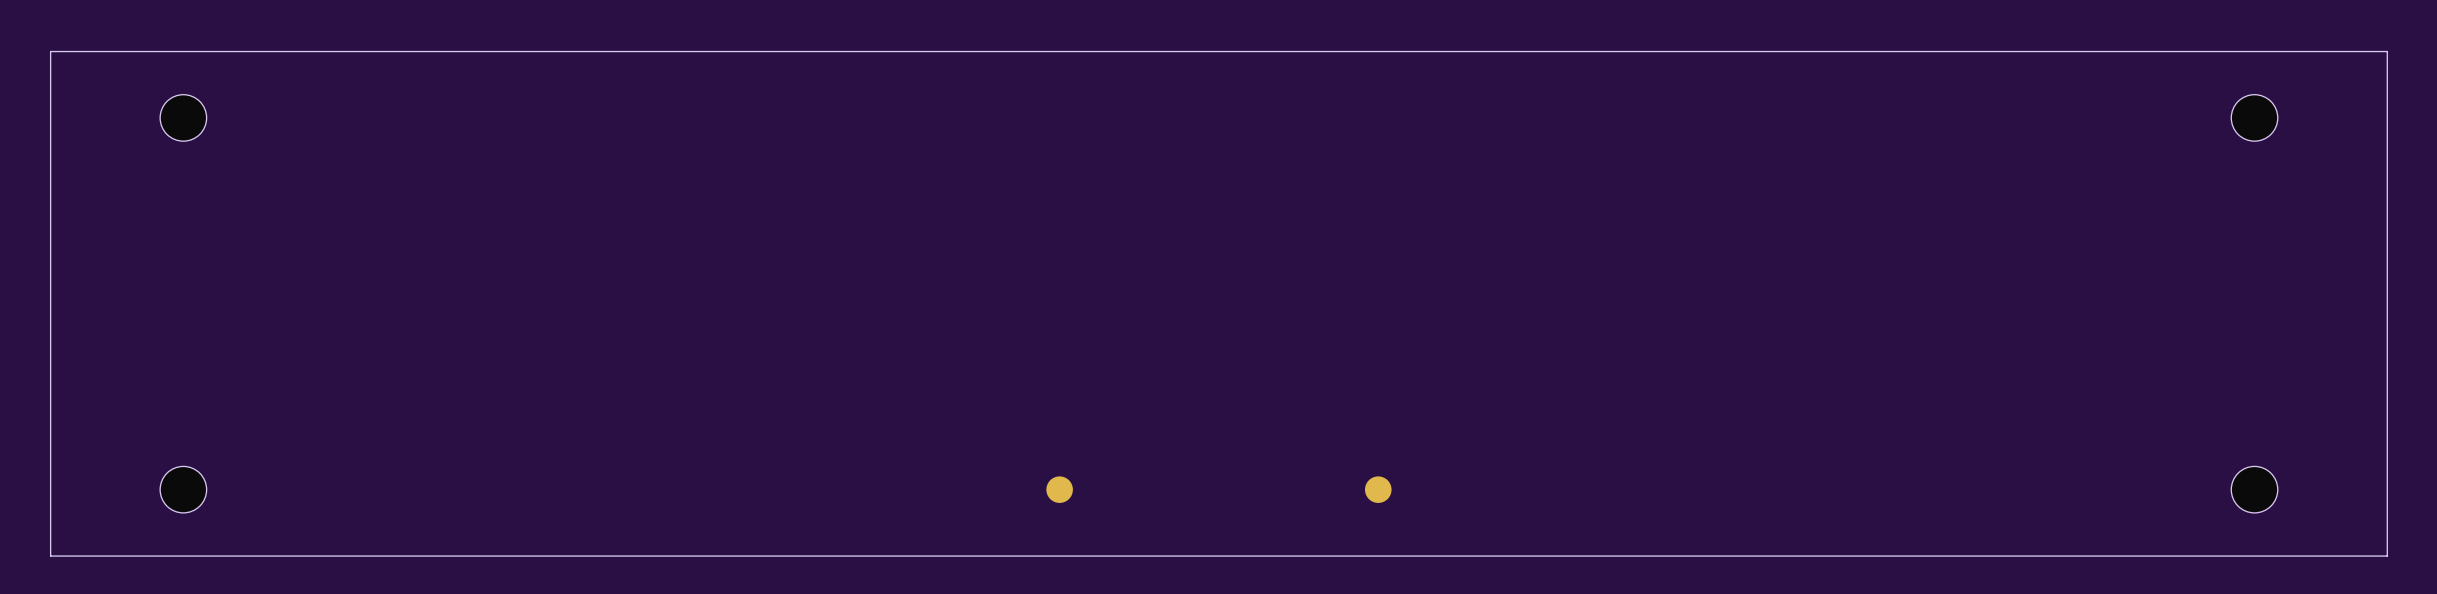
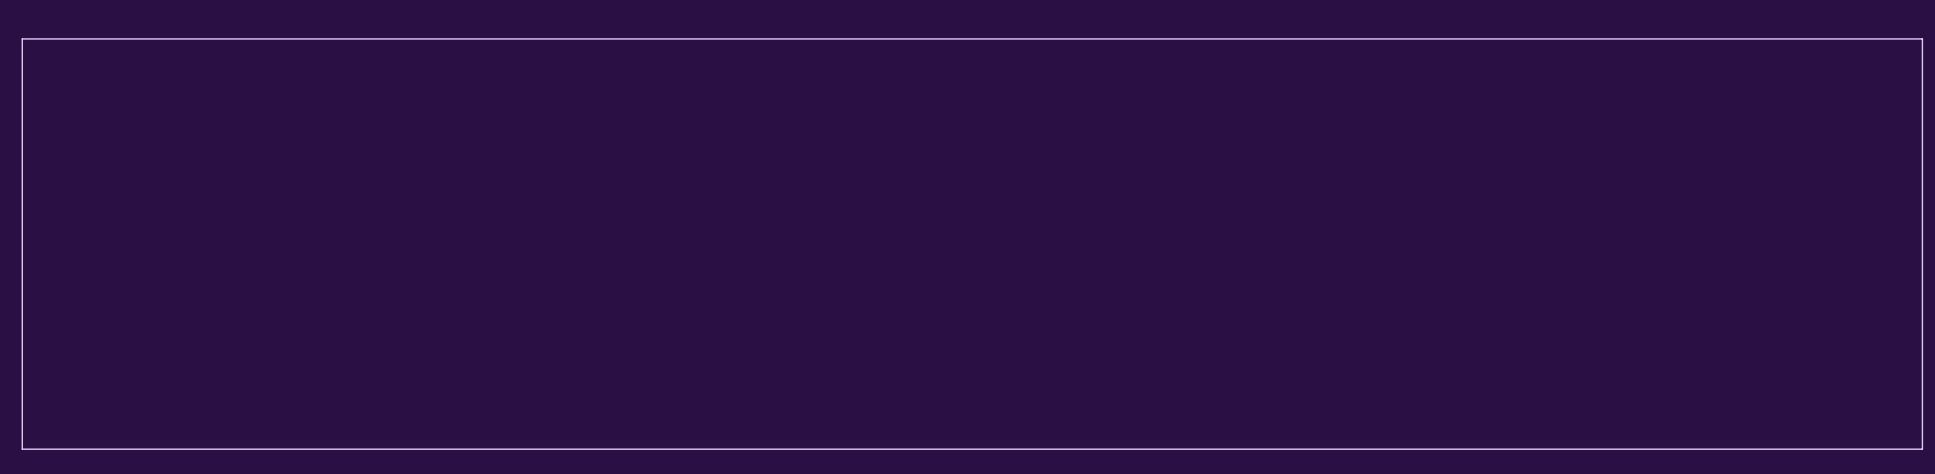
part: (183, 117) -> none
part: (2254, 117) -> none
part: (183, 489) -> none
part: (1059, 489) -> none
part: (1378, 489) -> none
part: (2254, 489) -> none

